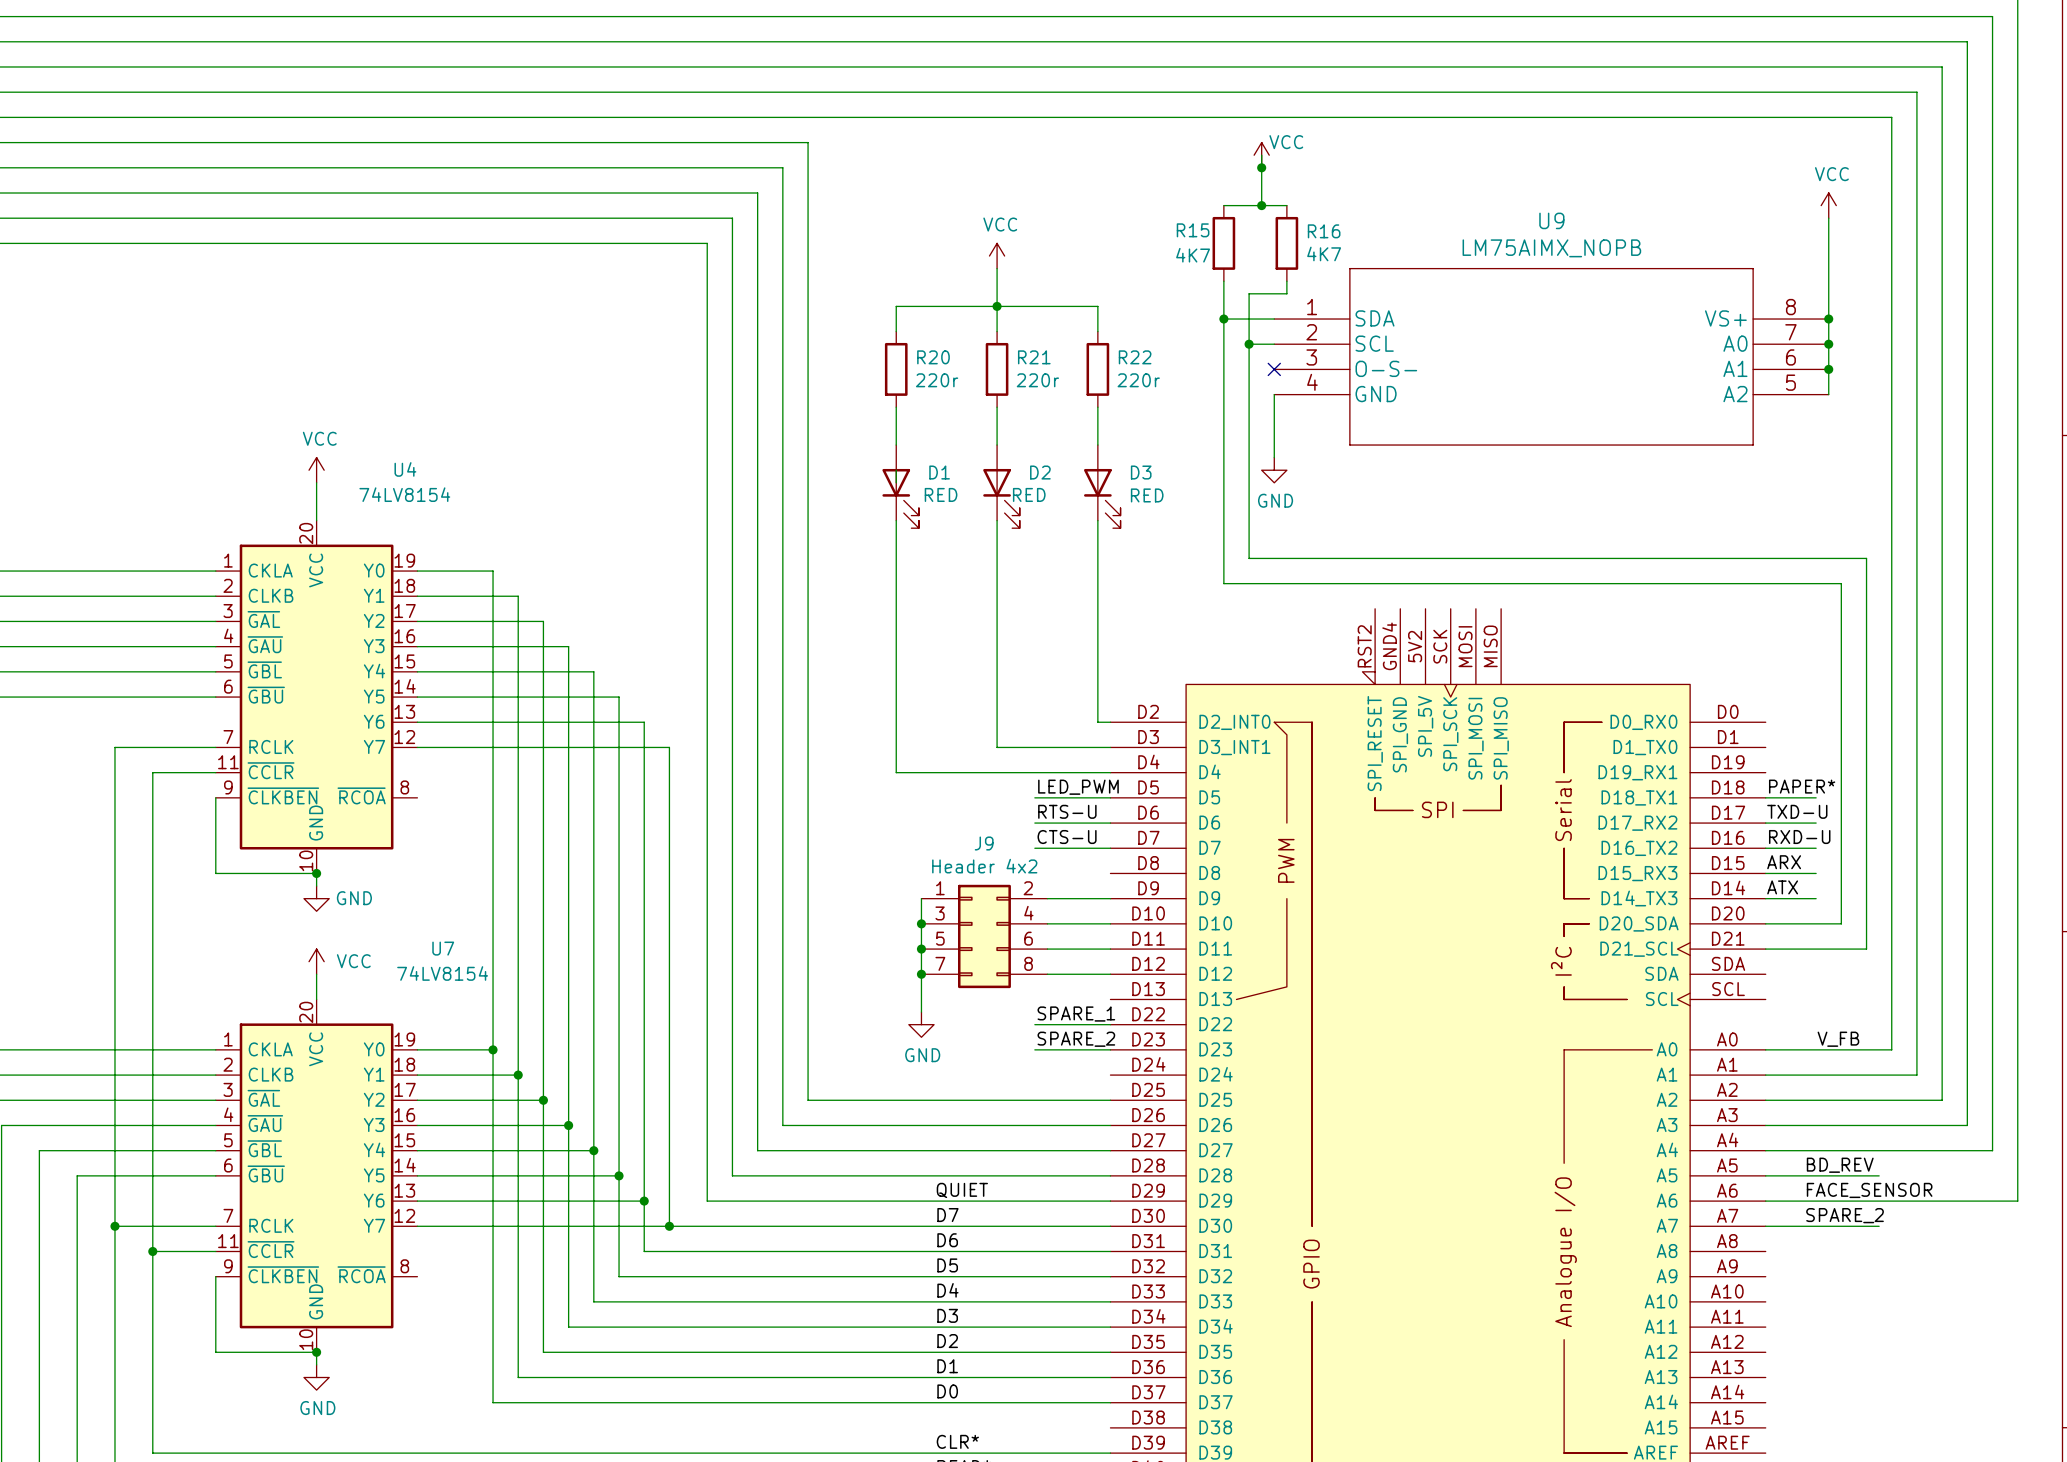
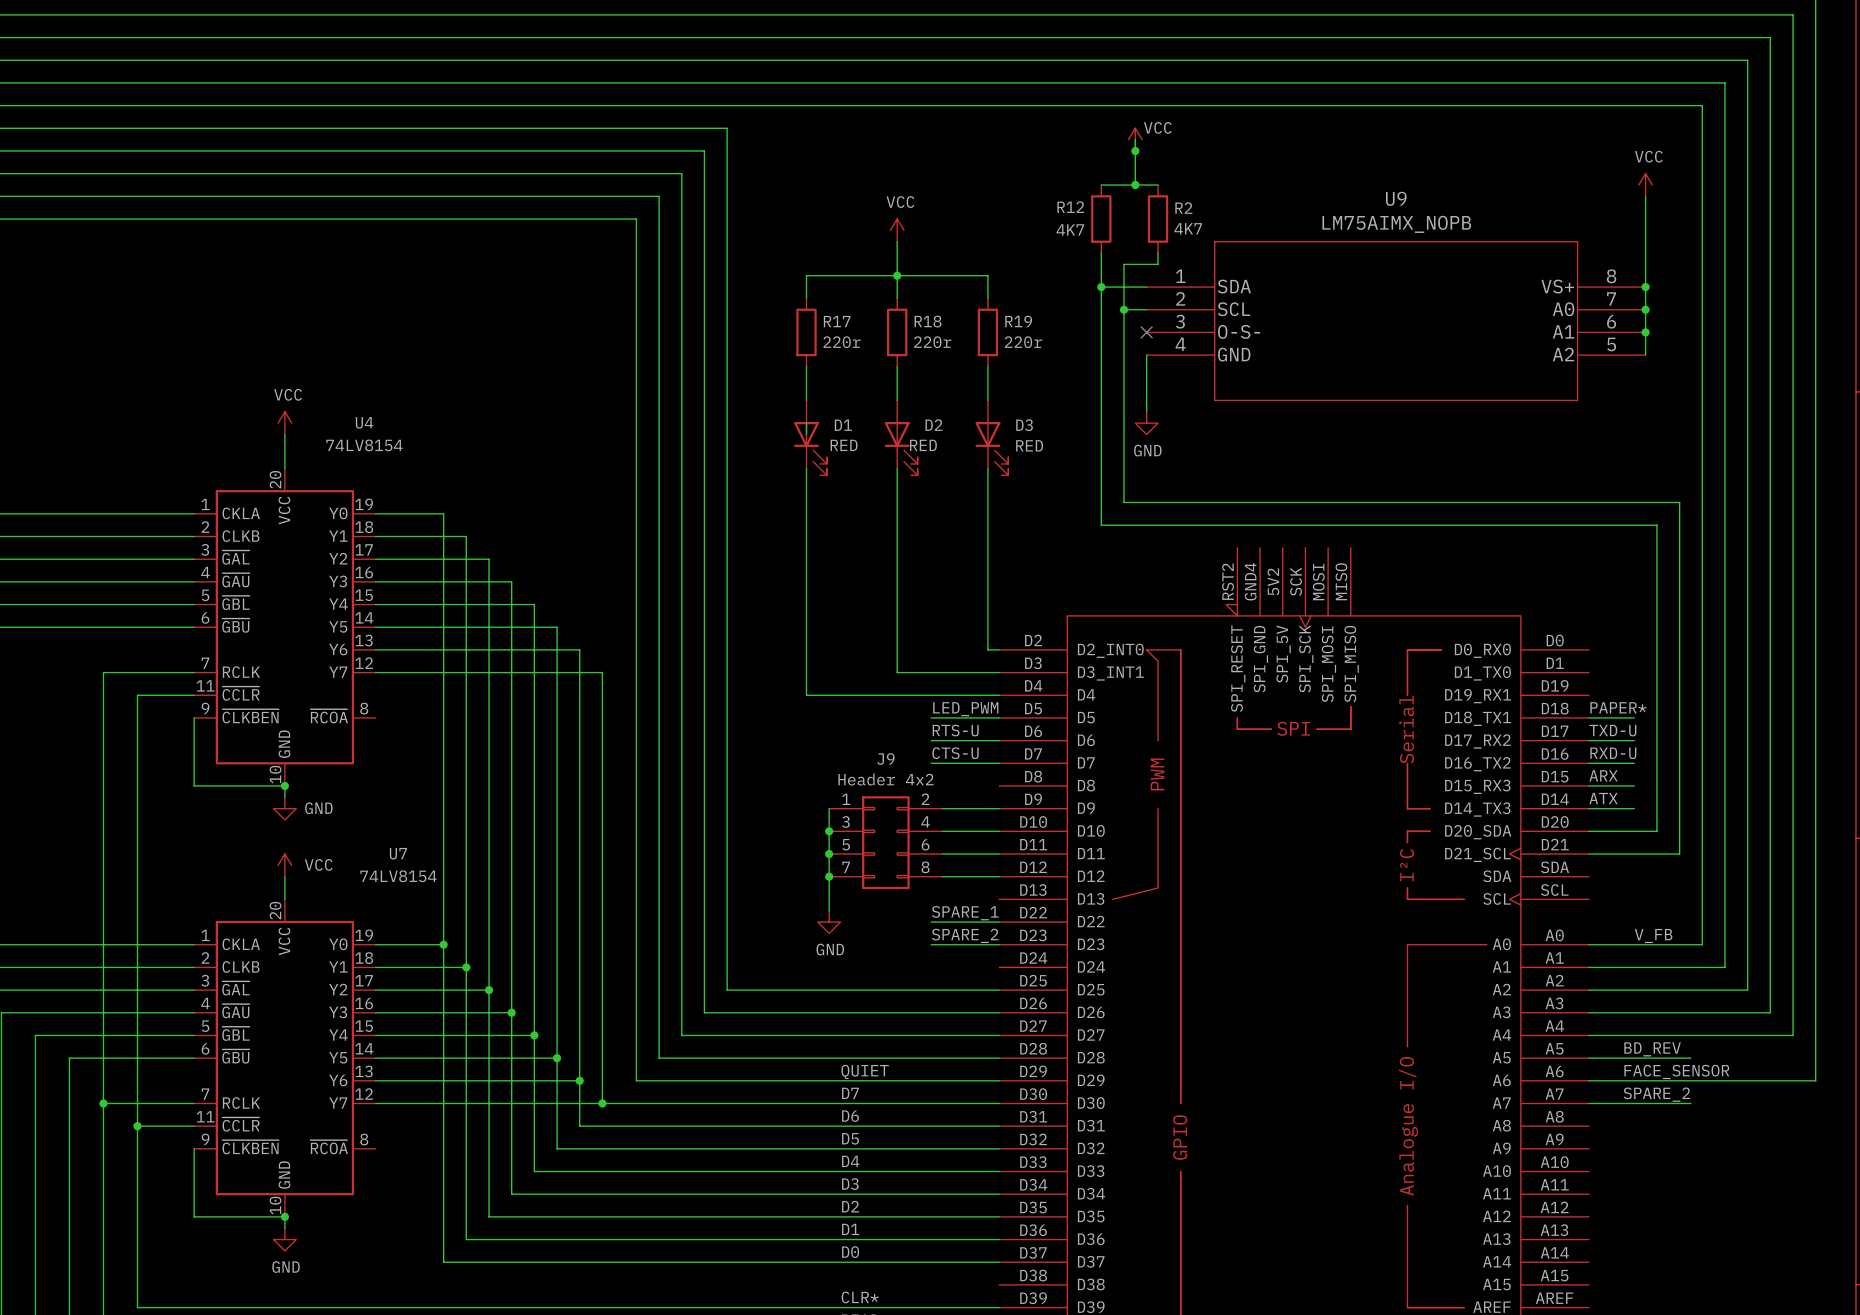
R15 name: R15 (1193, 230) -> R12 (1070, 207)
R16 name: R16 (1324, 231) -> R2 (1183, 208)
R20 name: R20 (933, 357) -> R17 (837, 321)
R21 name: R21 (1034, 357) -> R18 (927, 321)
R22 name: R22 (1135, 357) -> R19 (1018, 321)

